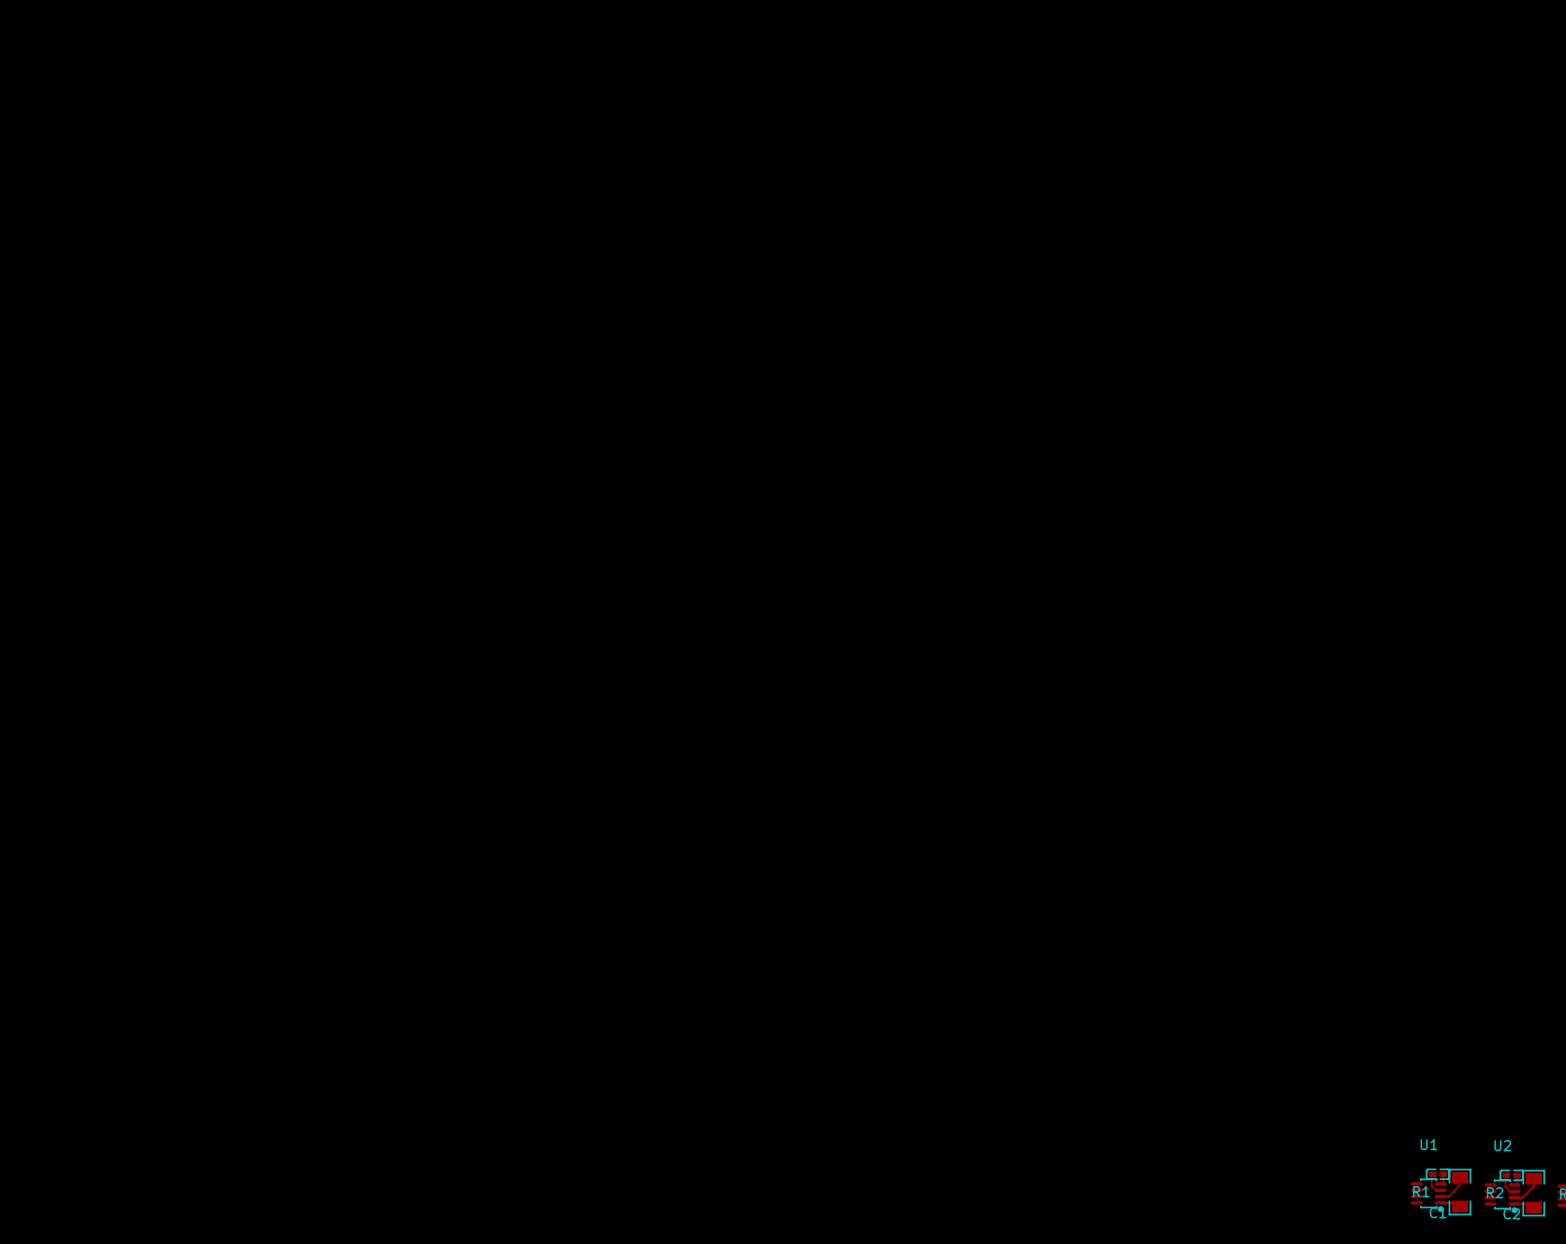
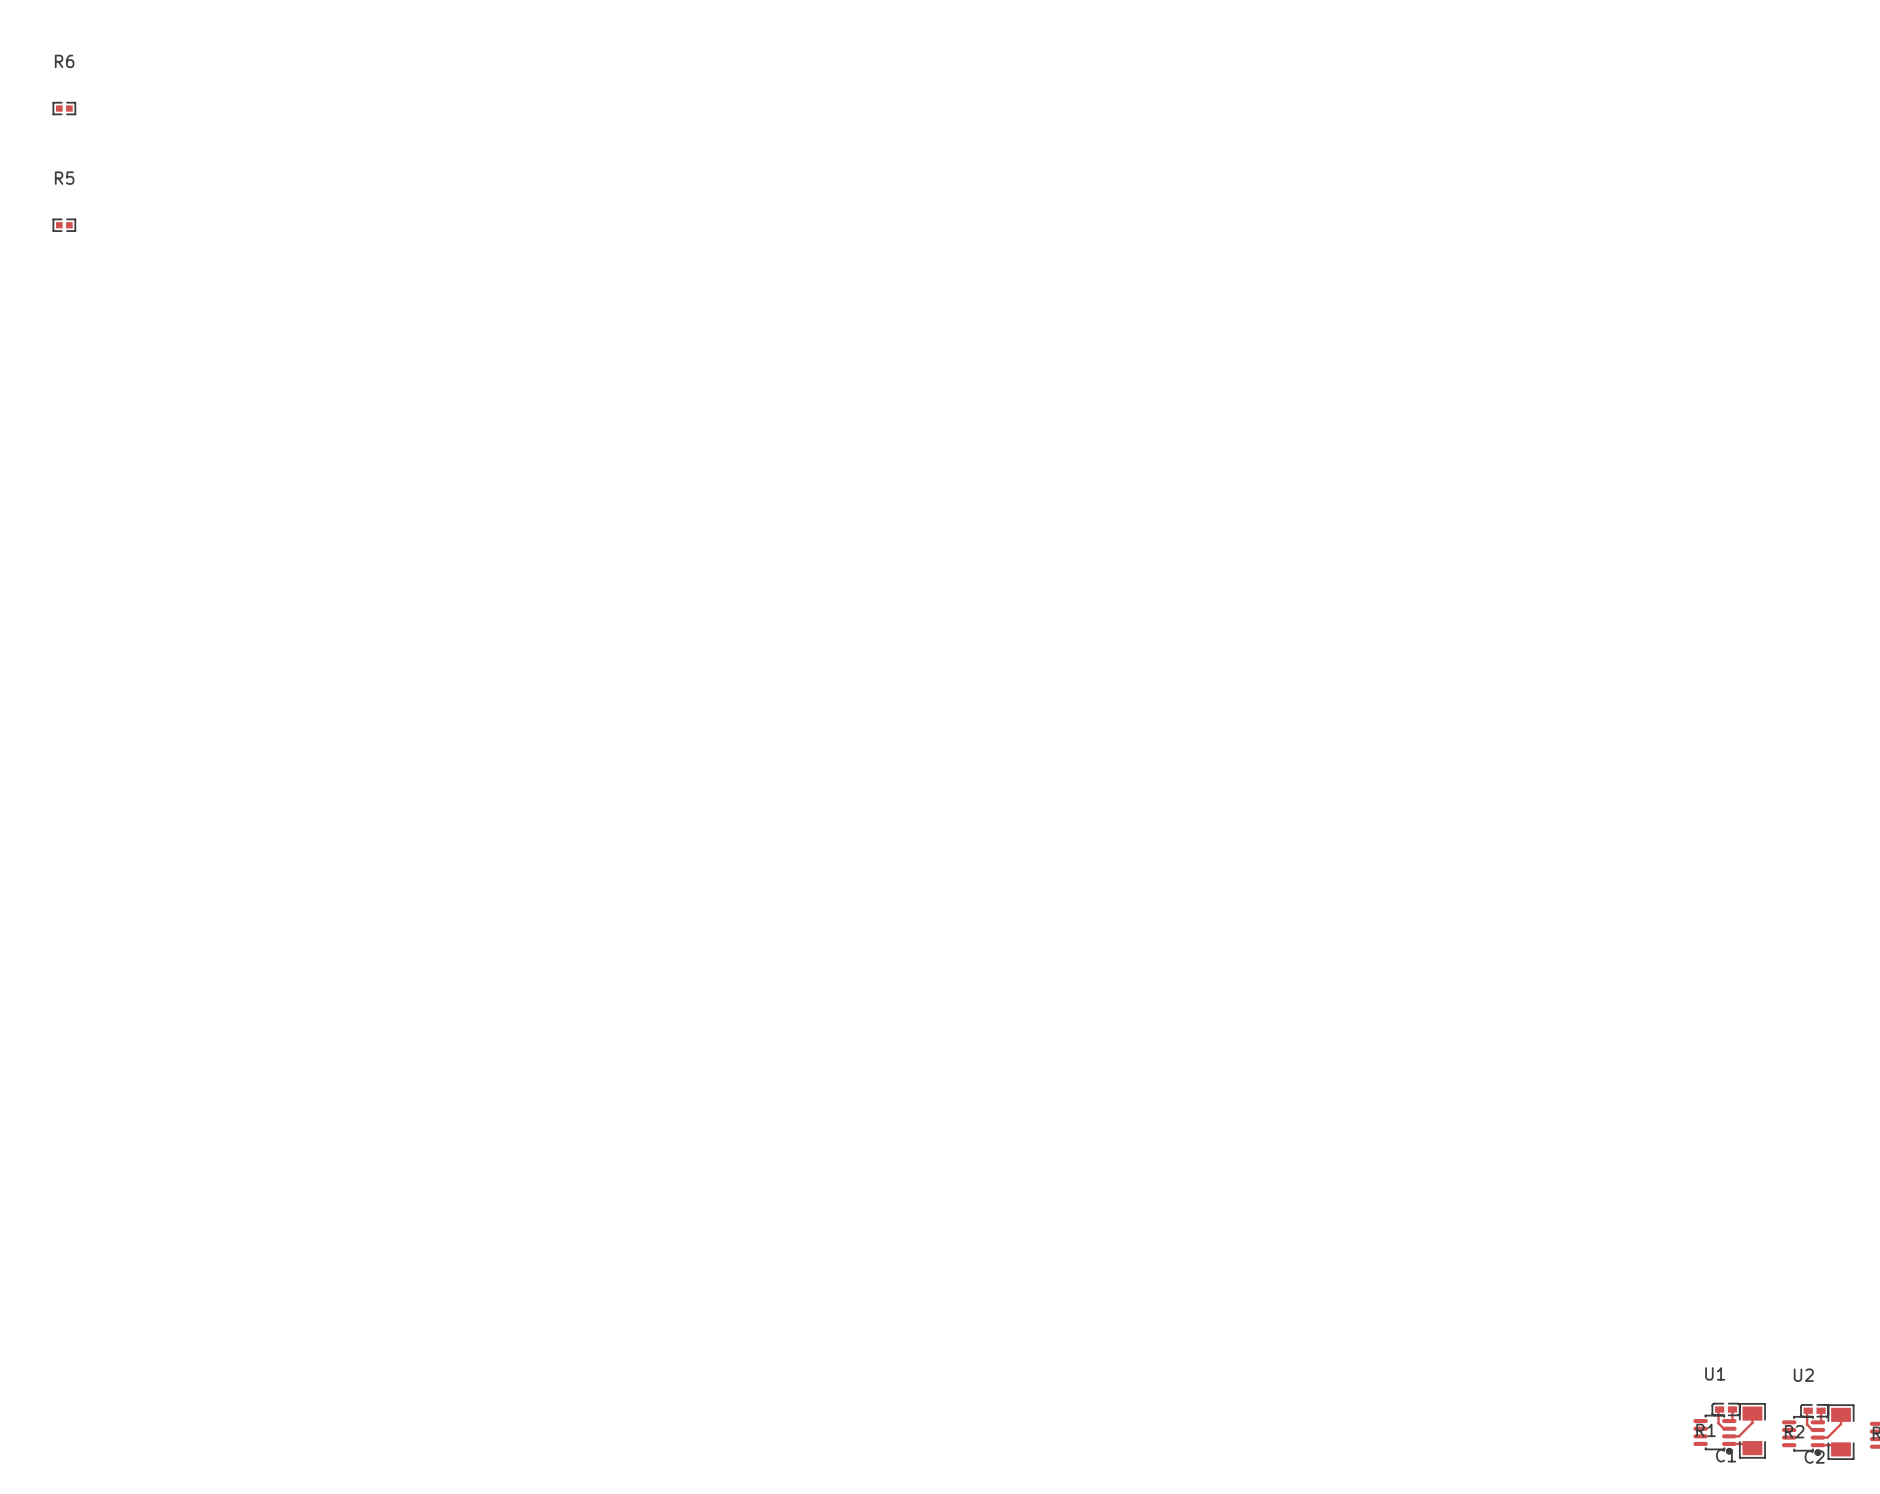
R6: none -> (64, 108)
R5: none -> (64, 225)

